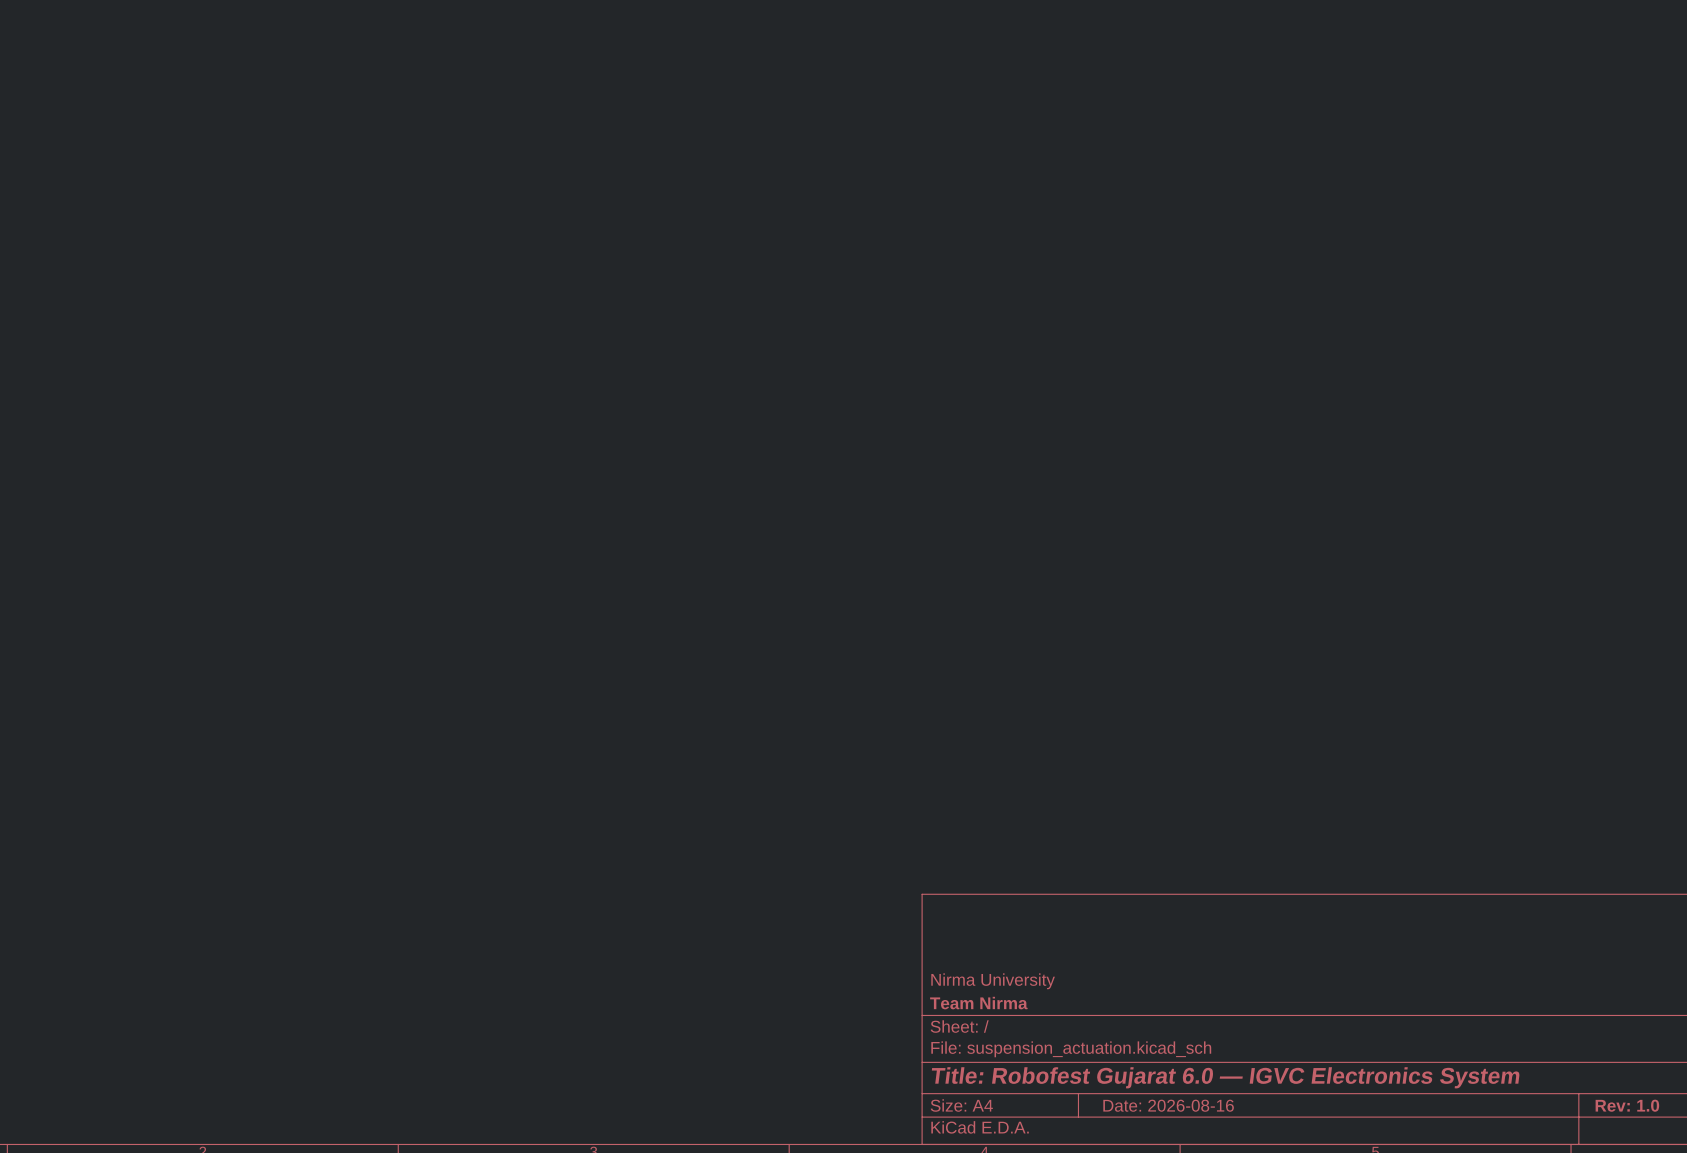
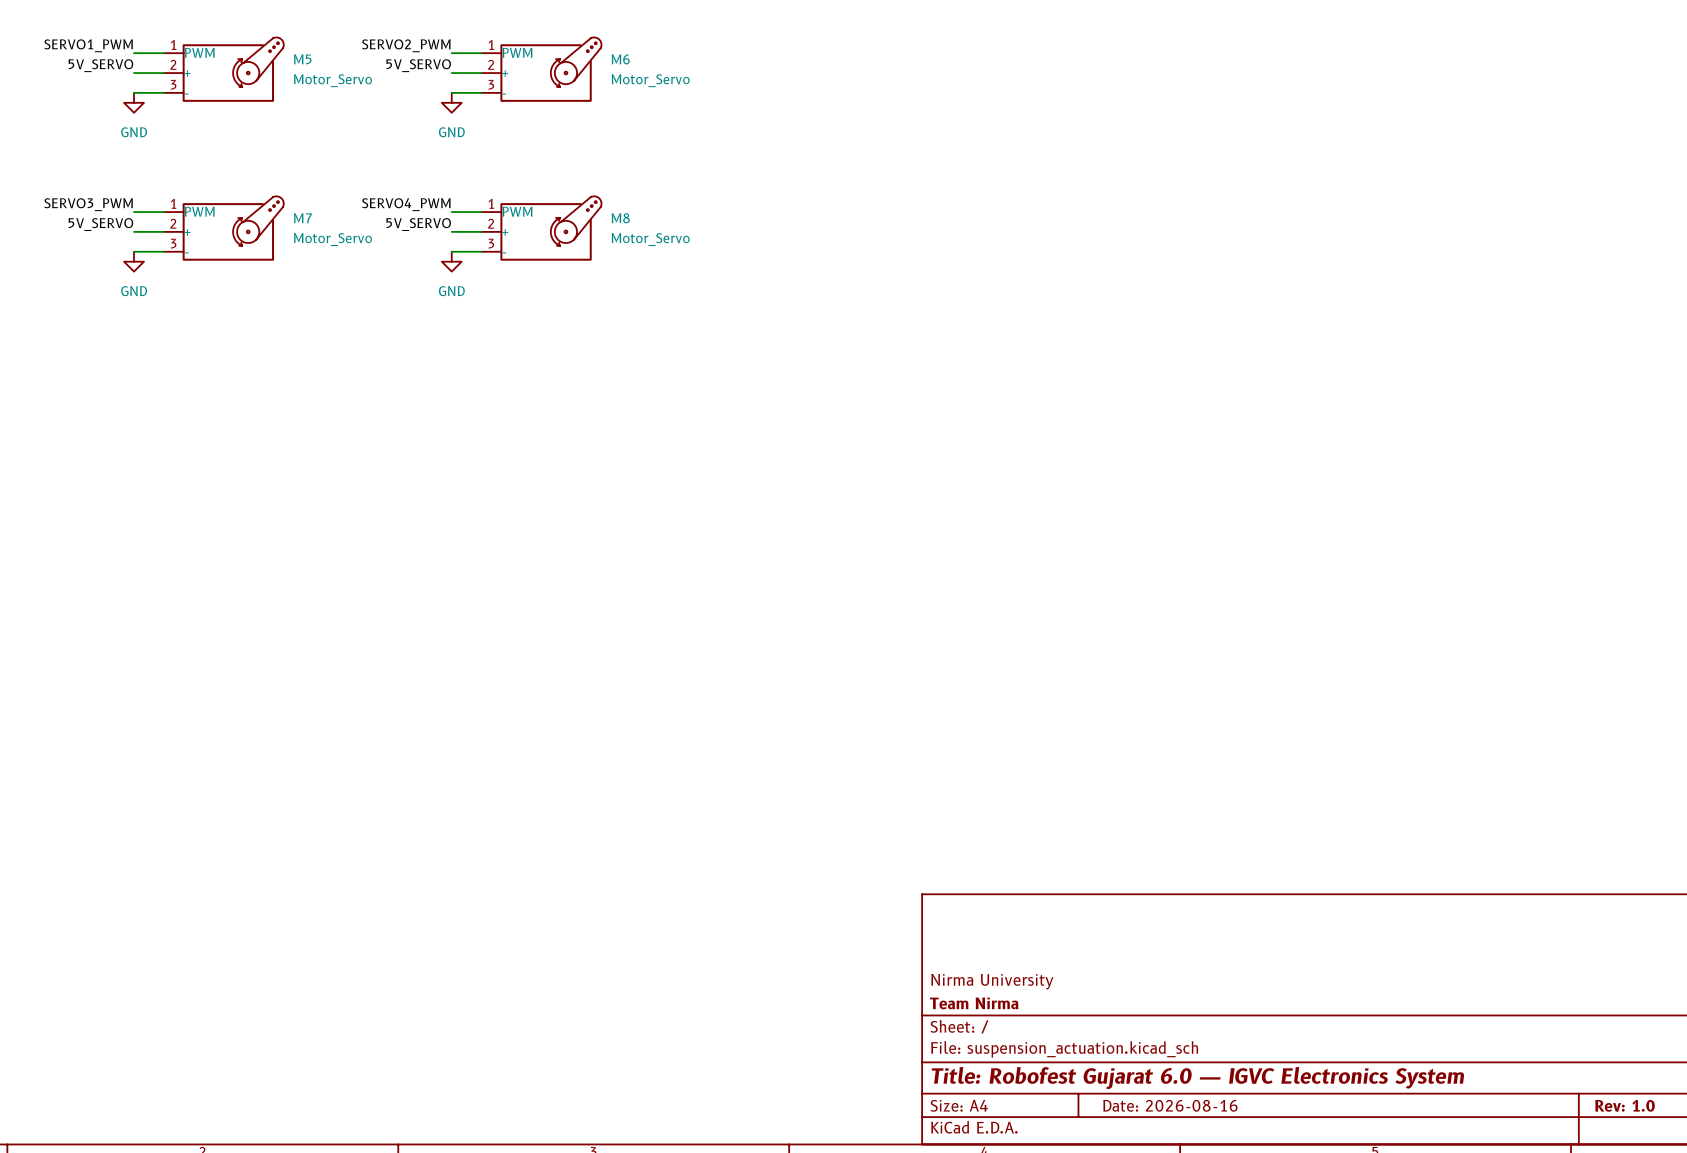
label: none -> SERVO1_PWM (88, 45)
label: none -> SERVO2_PWM (406, 45)
wire: none -> (134, 53) (163, 53)
wire: none -> (451, 53) (481, 53)
label: none -> 5V_SERVO (100, 65)
label: none -> 5V_SERVO (418, 65)
M5: none -> Motor_Servo (223, 69)
M6: none -> Motor_Servo (541, 69)
wire: none -> (134, 73) (163, 73)
wire: none -> (451, 73) (481, 73)
wire: none -> (134, 92) (163, 92)
wire: none -> (451, 92) (481, 92)
power symbol: none -> GND (134, 102)
power symbol: none -> GND (451, 102)
label: none -> SERVO3_PWM (88, 204)
label: none -> SERVO4_PWM (406, 204)
wire: none -> (134, 212) (163, 212)
wire: none -> (451, 212) (481, 212)
label: none -> 5V_SERVO (100, 224)
label: none -> 5V_SERVO (418, 224)
M7: none -> Motor_Servo (223, 228)
M8: none -> Motor_Servo (541, 228)
wire: none -> (134, 231) (163, 231)
wire: none -> (451, 231) (481, 231)
wire: none -> (134, 251) (163, 251)
wire: none -> (451, 251) (481, 251)
power symbol: none -> GND (134, 261)
power symbol: none -> GND (451, 261)

